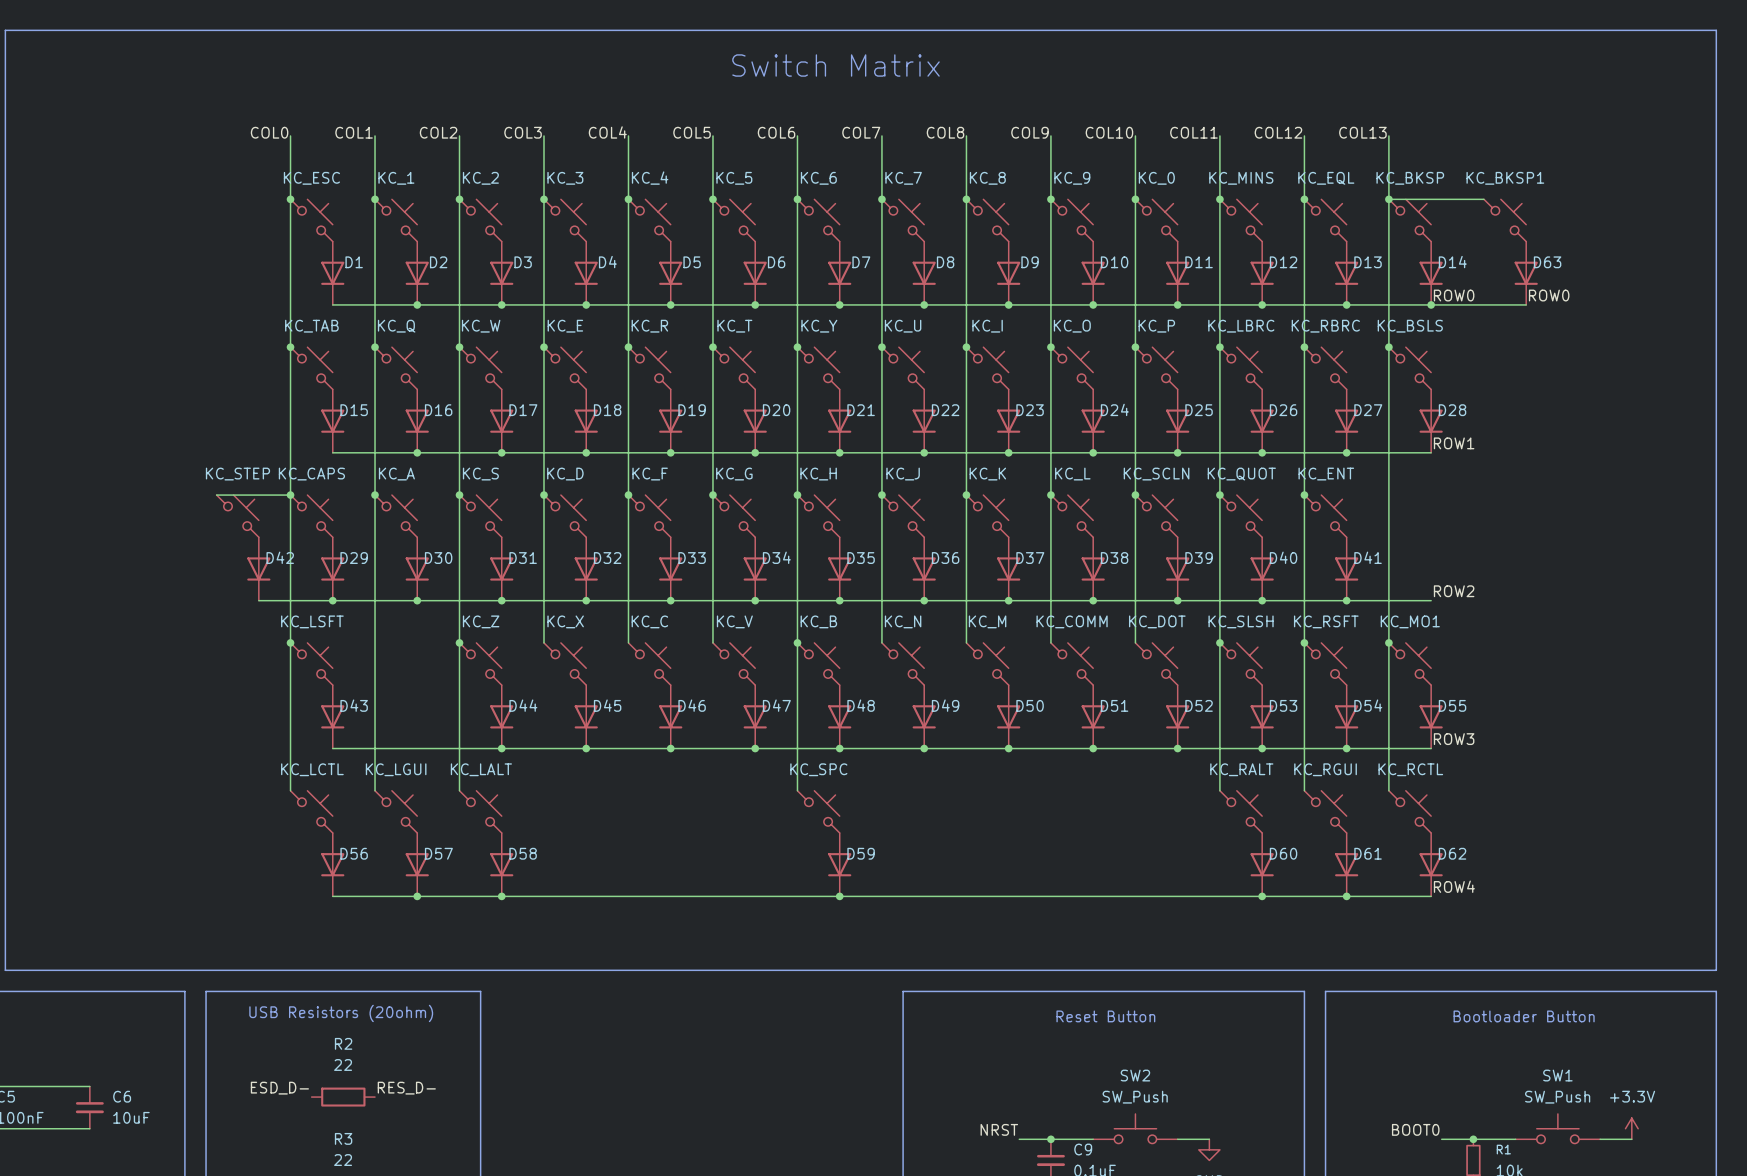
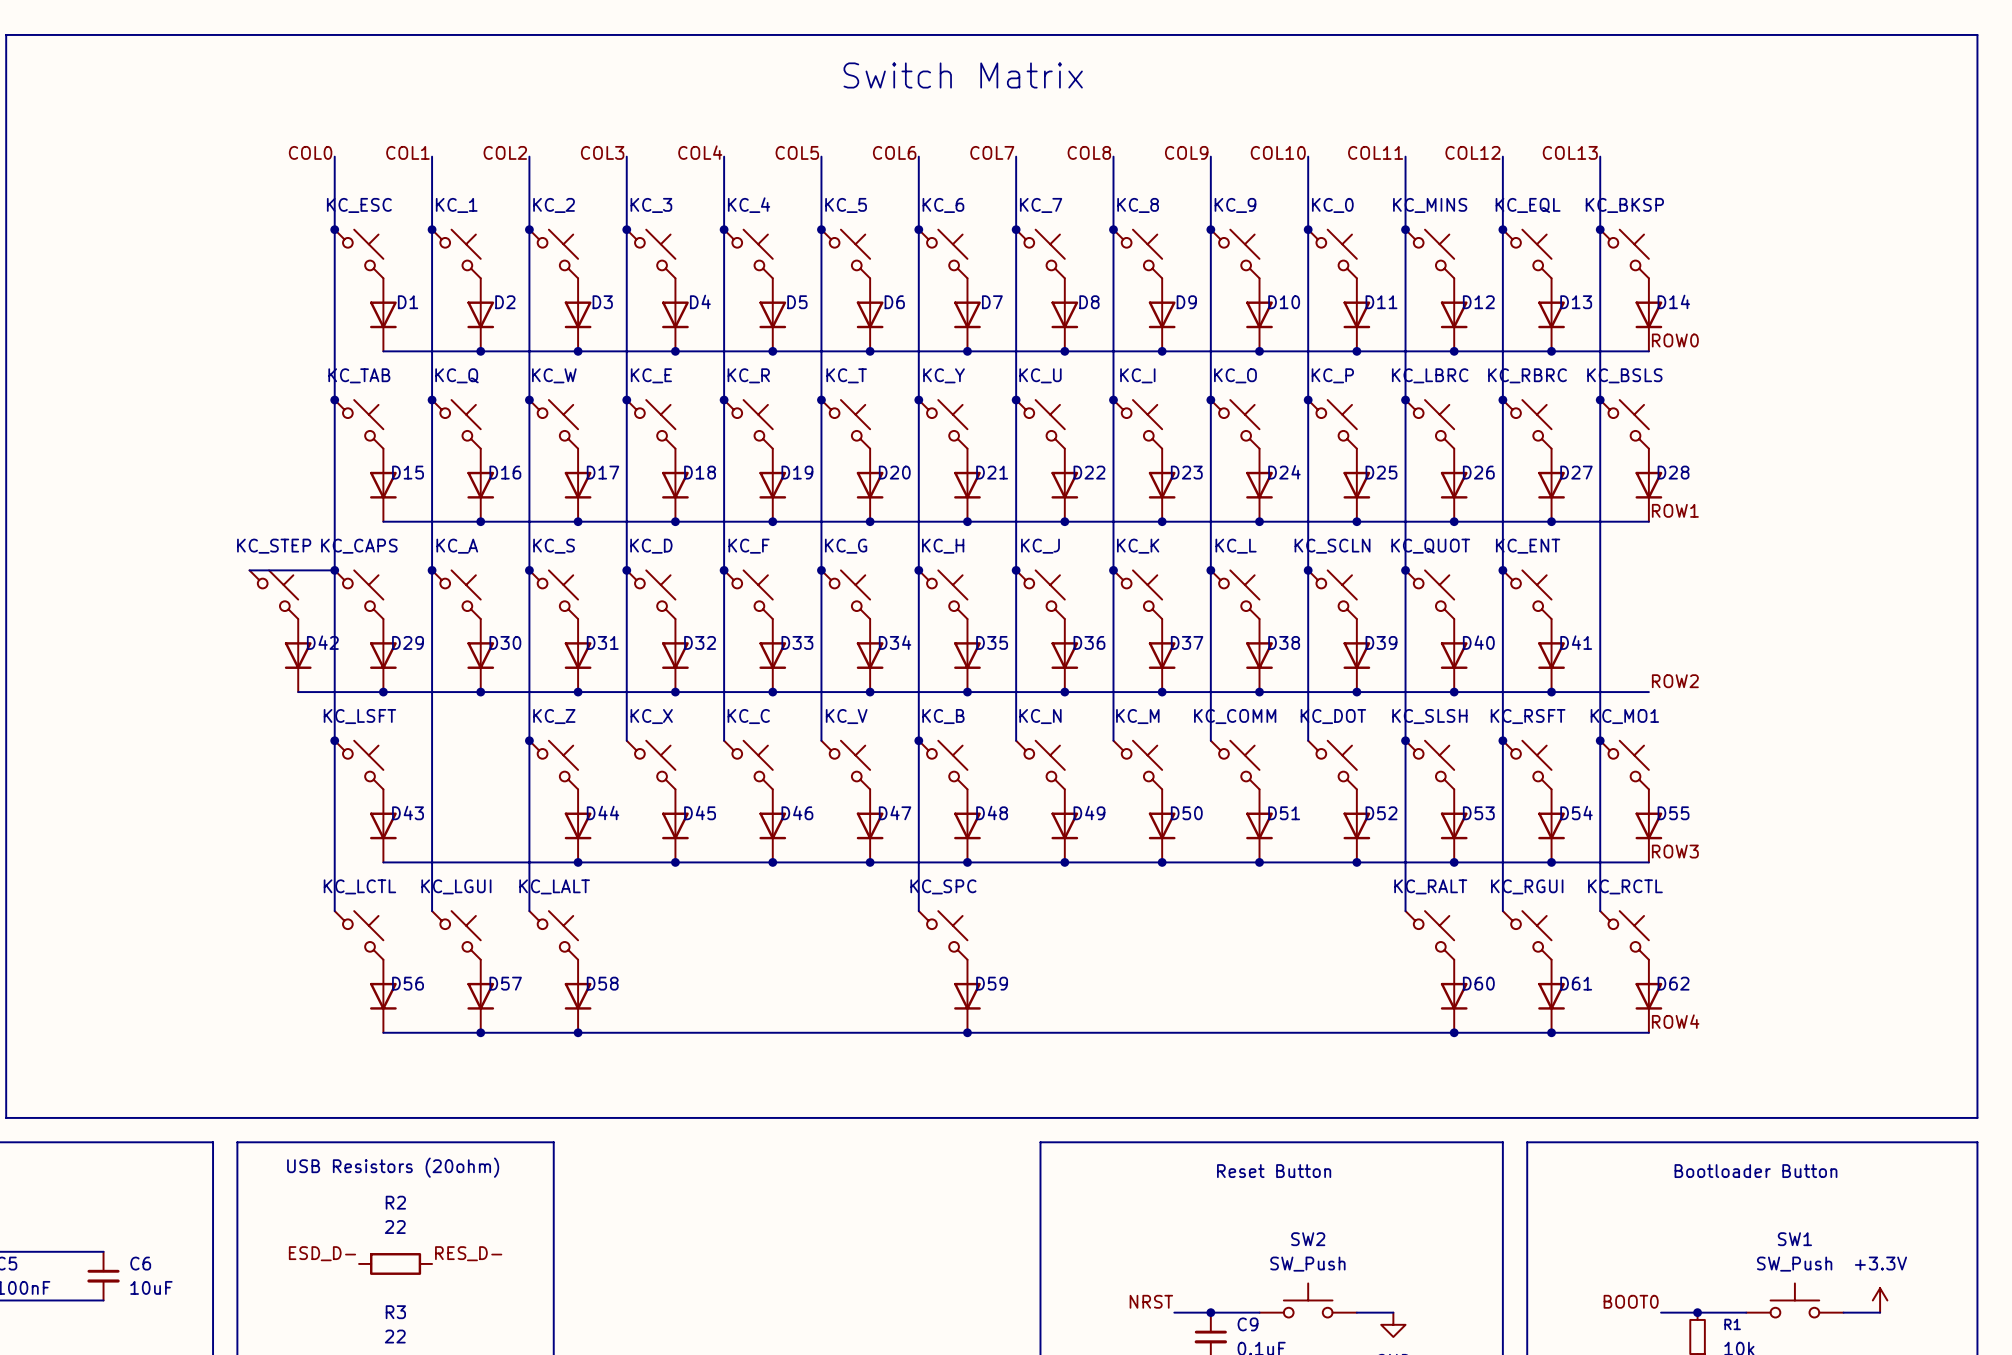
wire: (1388, 199) (1483, 199) -> none
KC_BKSP1: (1505, 220) -> none
D63: (1526, 273) -> none
label: ROW0 (1549, 295) -> none
wire: (1431, 304) (1526, 304) -> none
junction: (1431, 304) -> none

